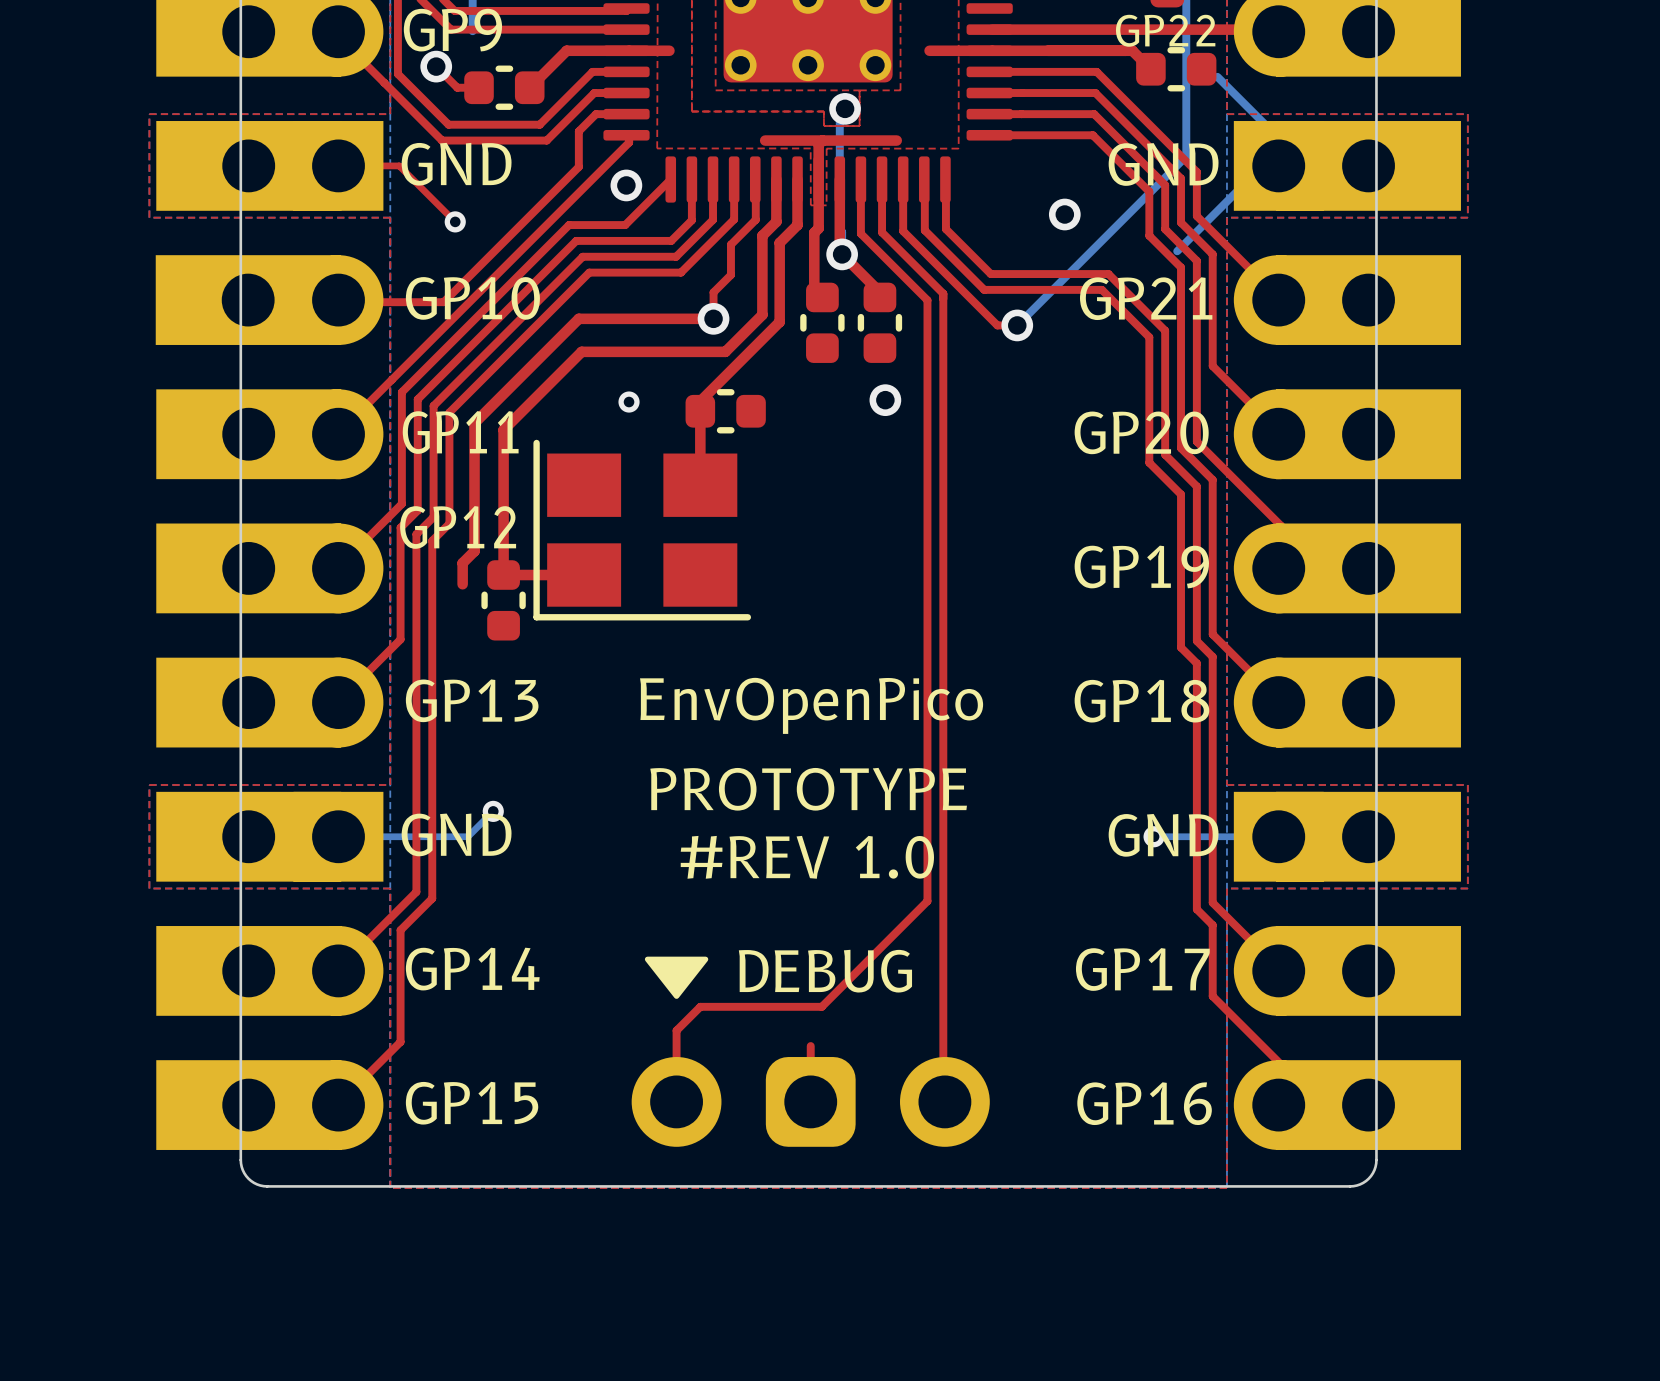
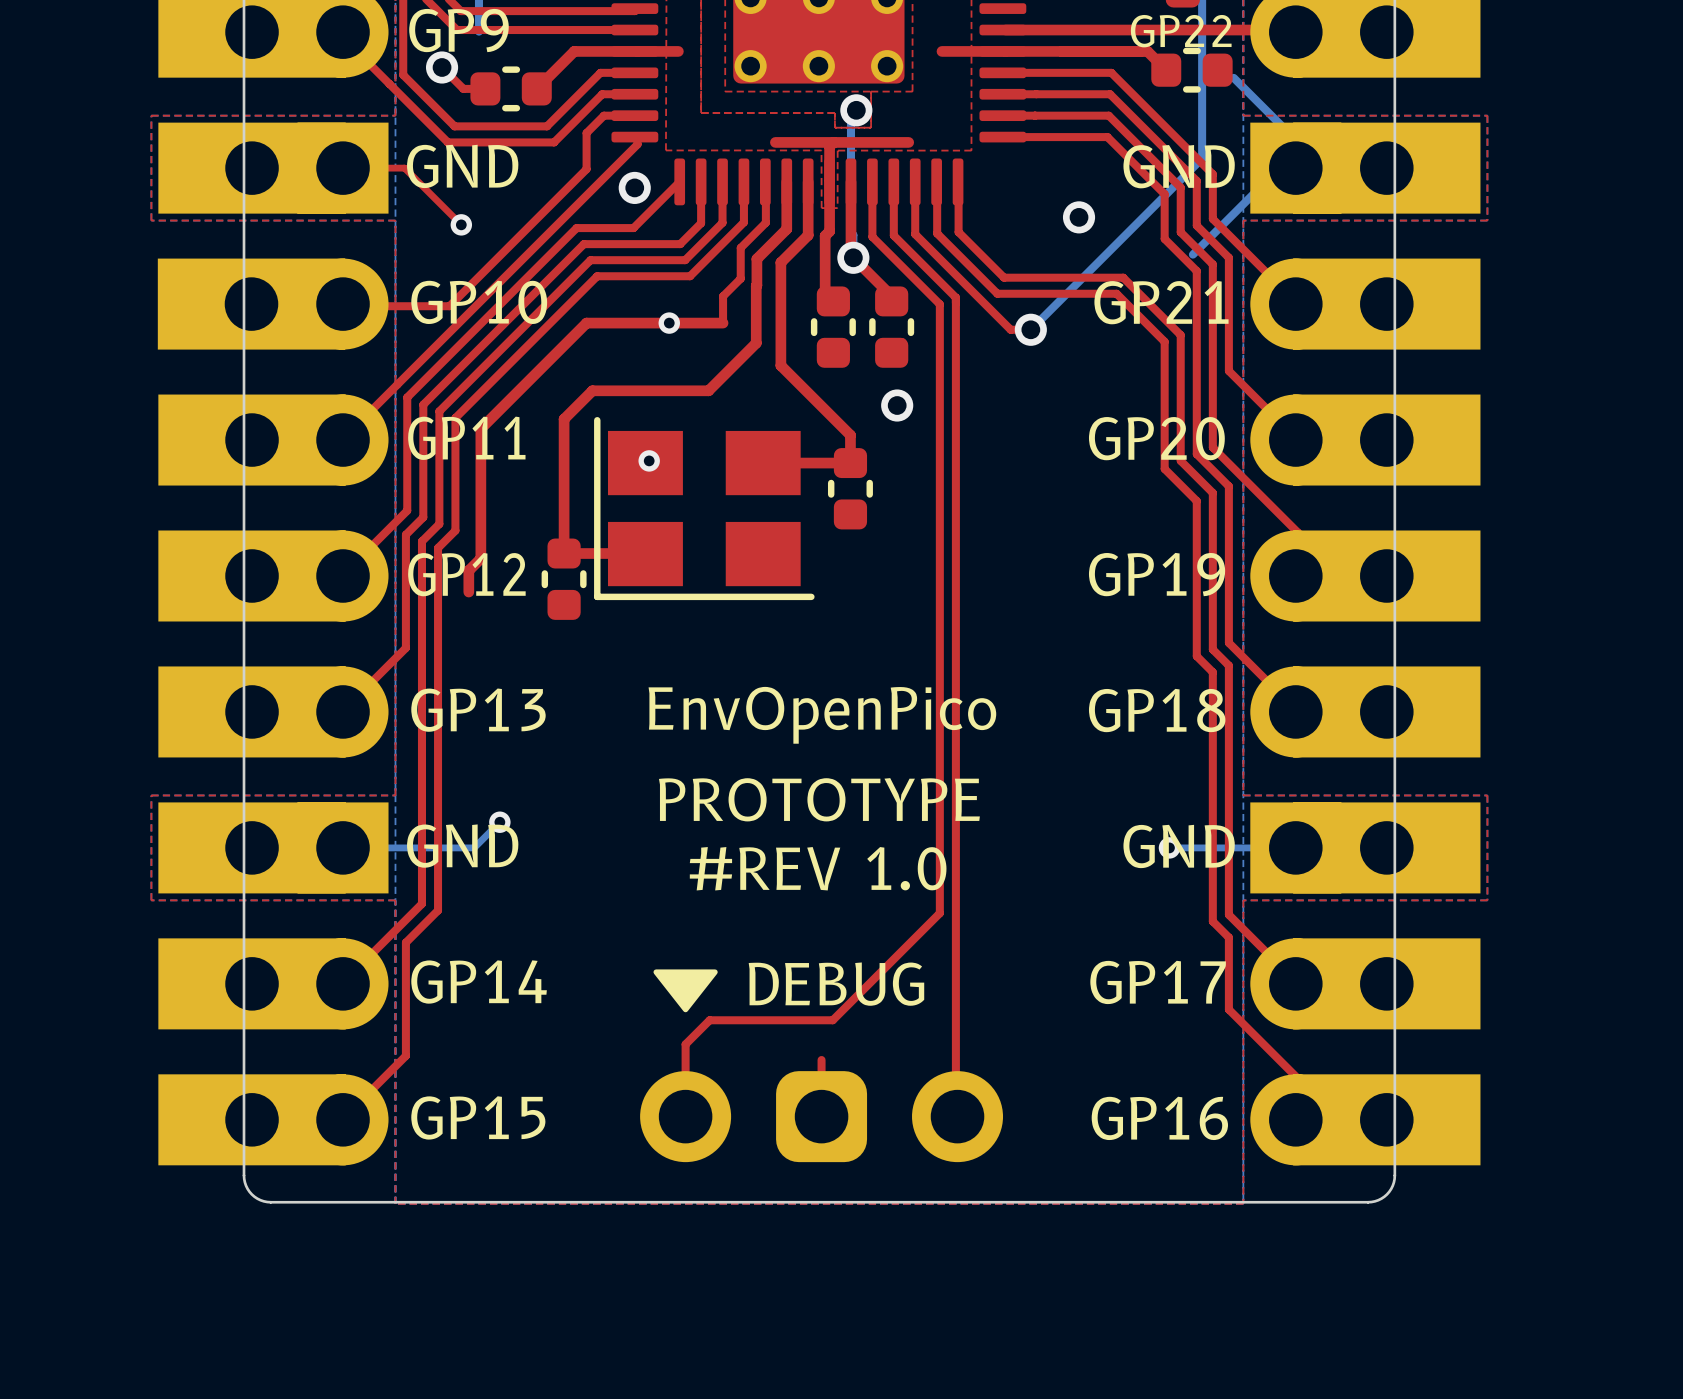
top track: (776, 221) (762, 235) (762, 314) (725, 351) (581, 351) (503, 429) (503, 575) (584, 575) -> (786, 224) (786, 229) (756, 259) (756, 285)
top track: (797, 225) (779, 242) (779, 322) (700, 401) (700, 485) -> (808, 228) (808, 235) (780, 262) (780, 365) (850, 435) (850, 463) (763, 463)
top track: none -> (756, 285) (756, 343) (708, 390) (592, 390) (564, 419) (564, 553) (644, 553)
via: none -> (669, 323)
via: (713, 318) -> none
via: (629, 402) -> none
part: (725, 411) -> none
via: none -> (649, 460)
part: none -> (850, 488)
text position: GP12 (458, 527) -> GP12 (466, 574)
part position: (642, 530) -> (704, 508)
part position: (503, 600) -> (564, 579)

